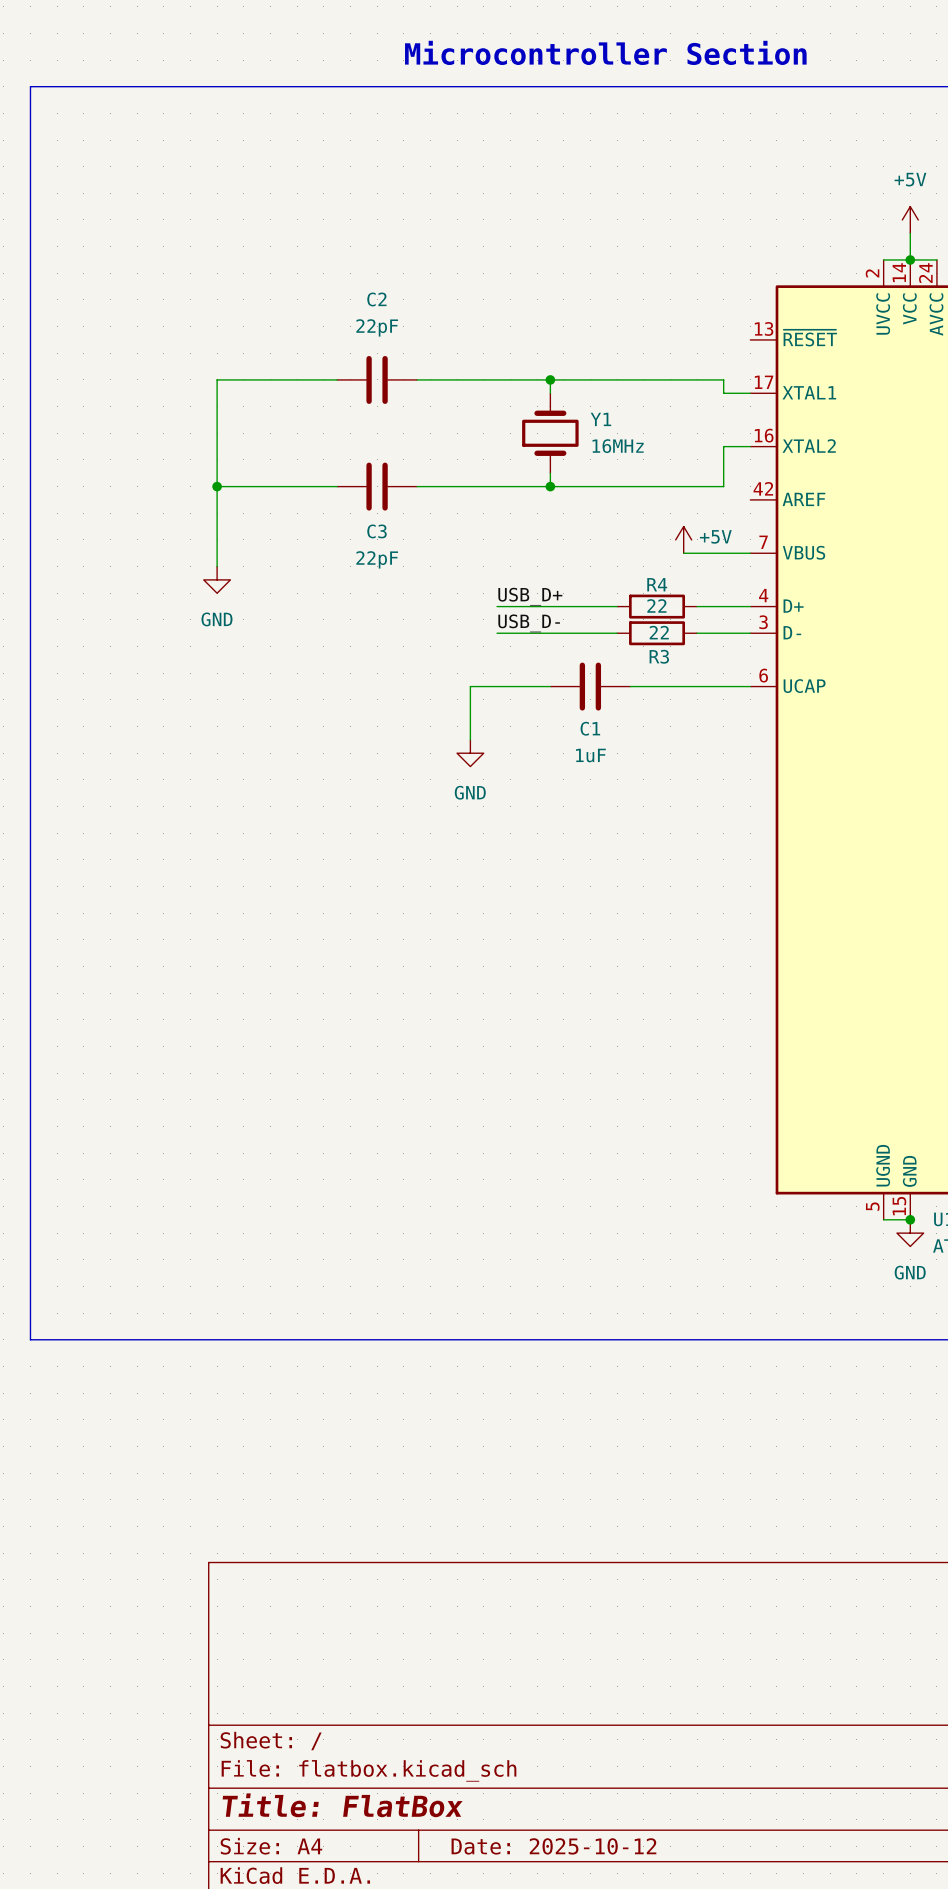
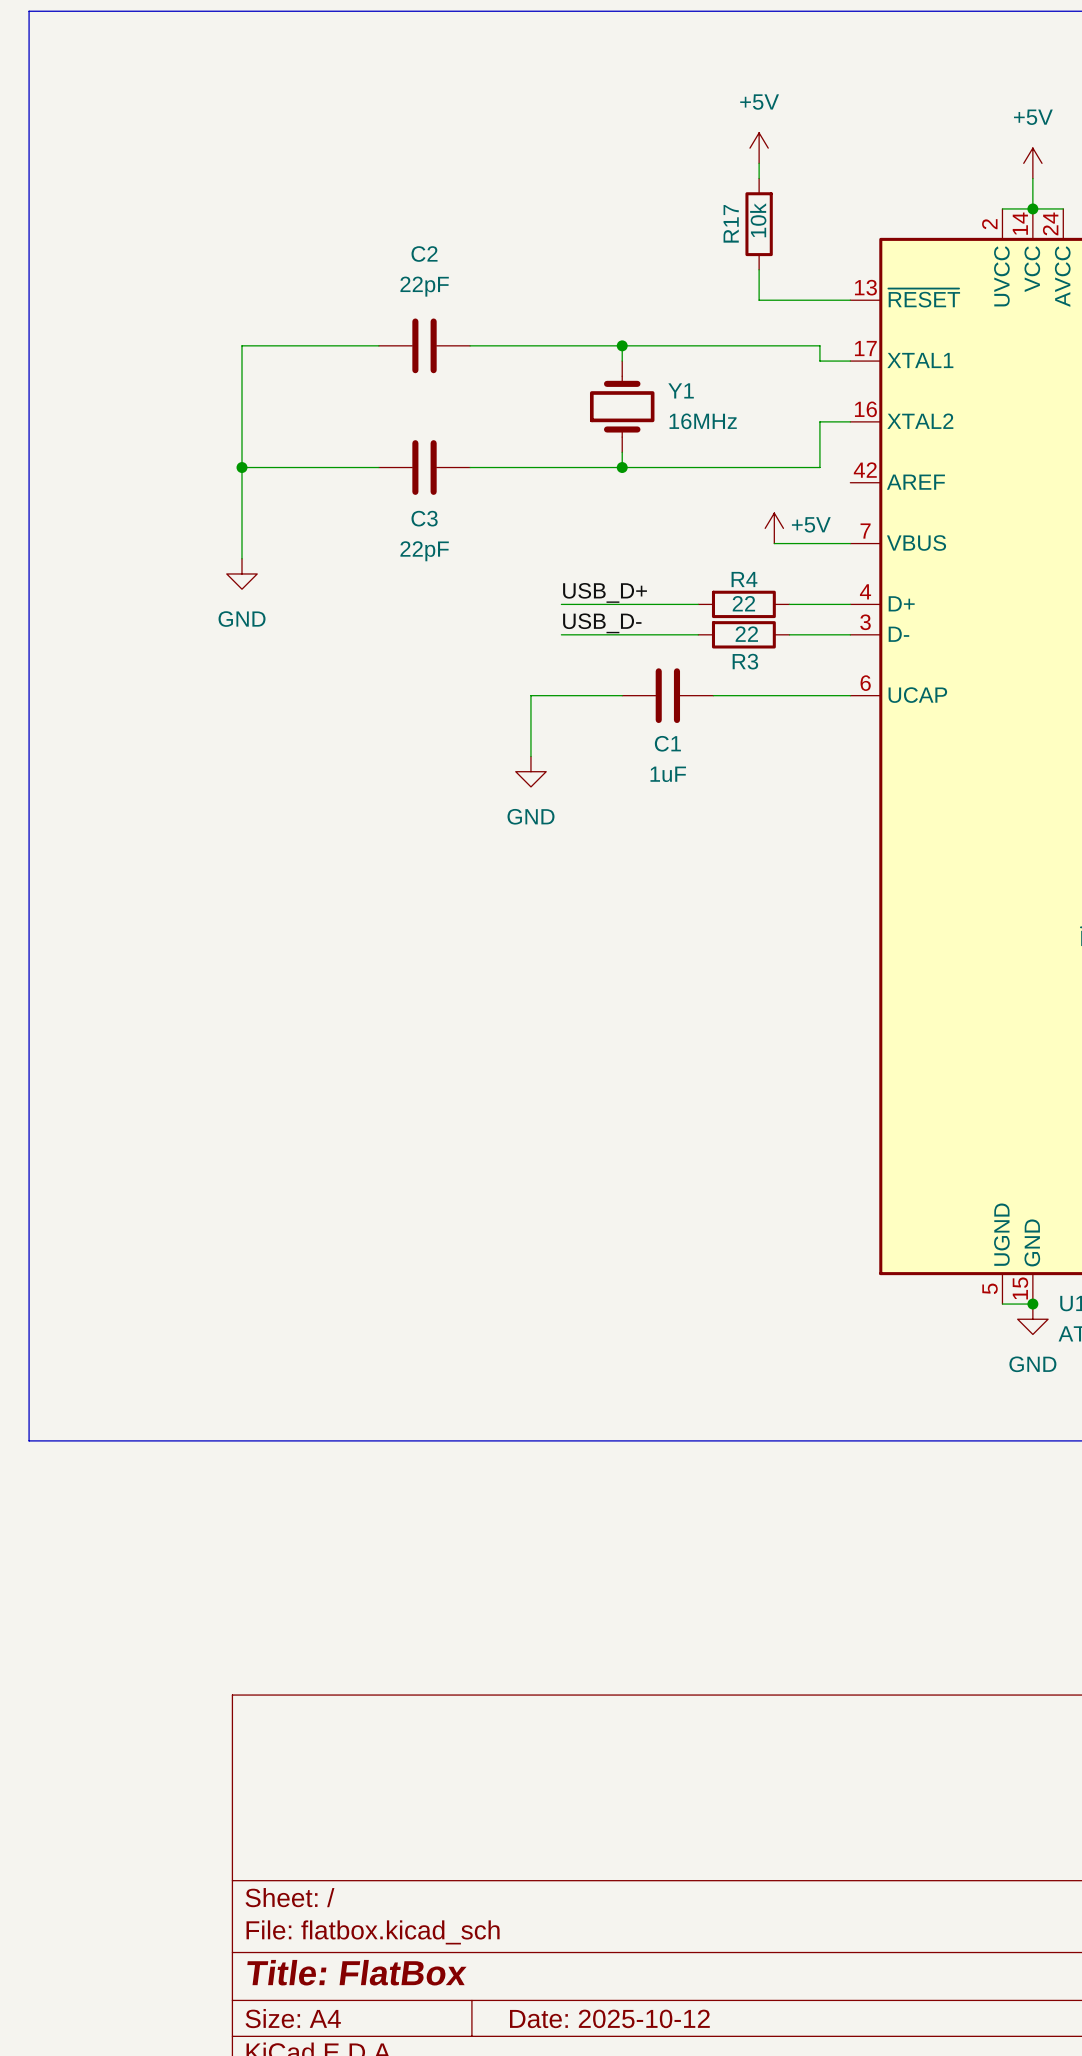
power symbol: none -> +5V (759, 148)
wire: none -> (759, 163) (759, 178)
R17: none -> 10k (759, 224)
wire: none -> (759, 269) (759, 300) (850, 300)

